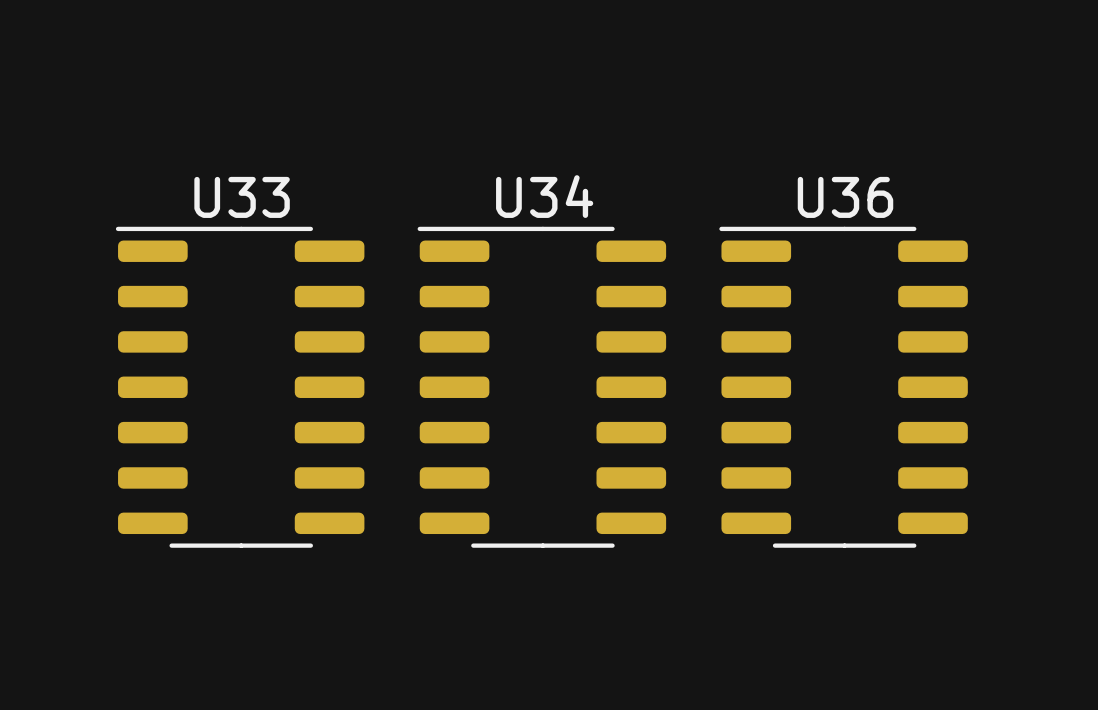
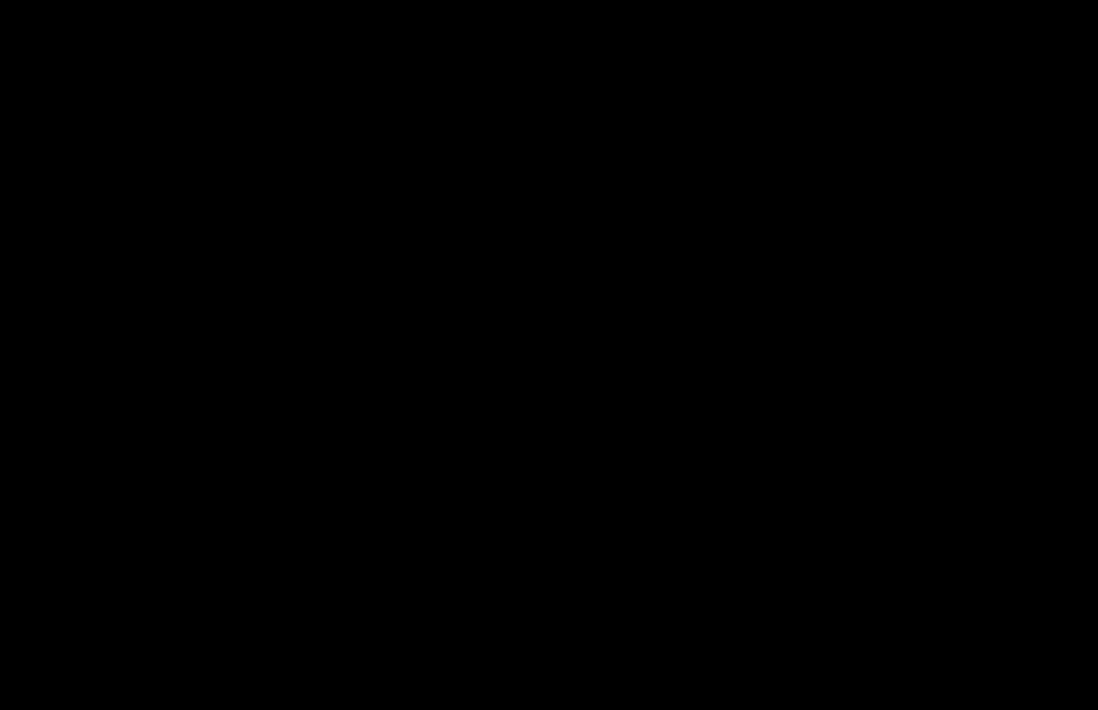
U33: (240, 387) -> none
U34: (541, 387) -> none
U36: (843, 387) -> none

